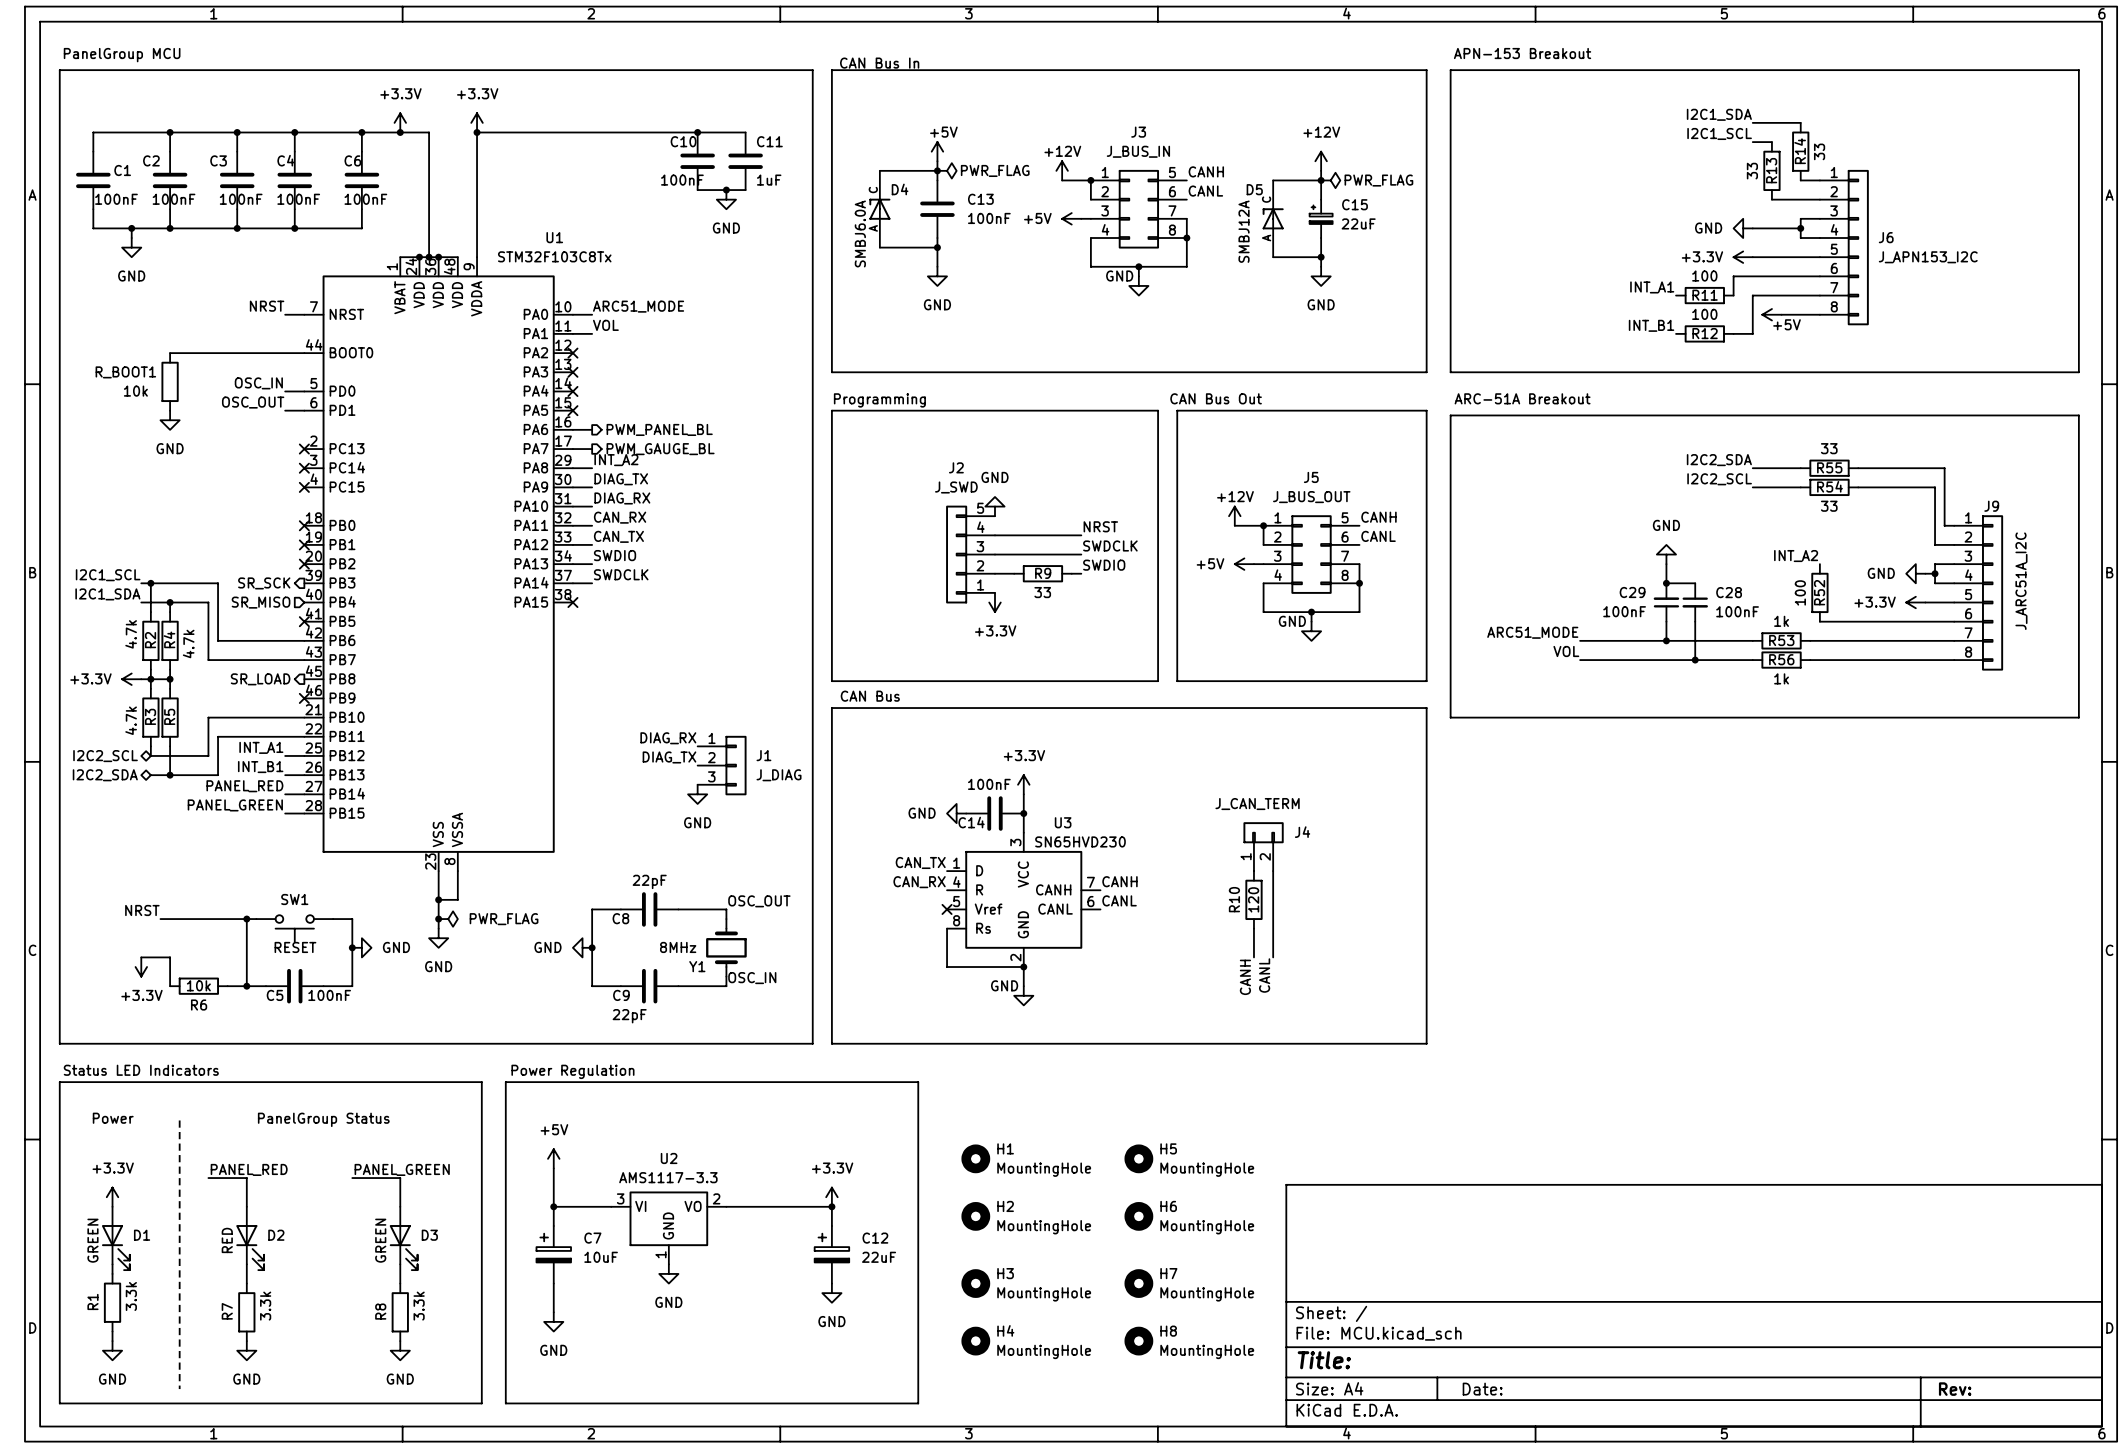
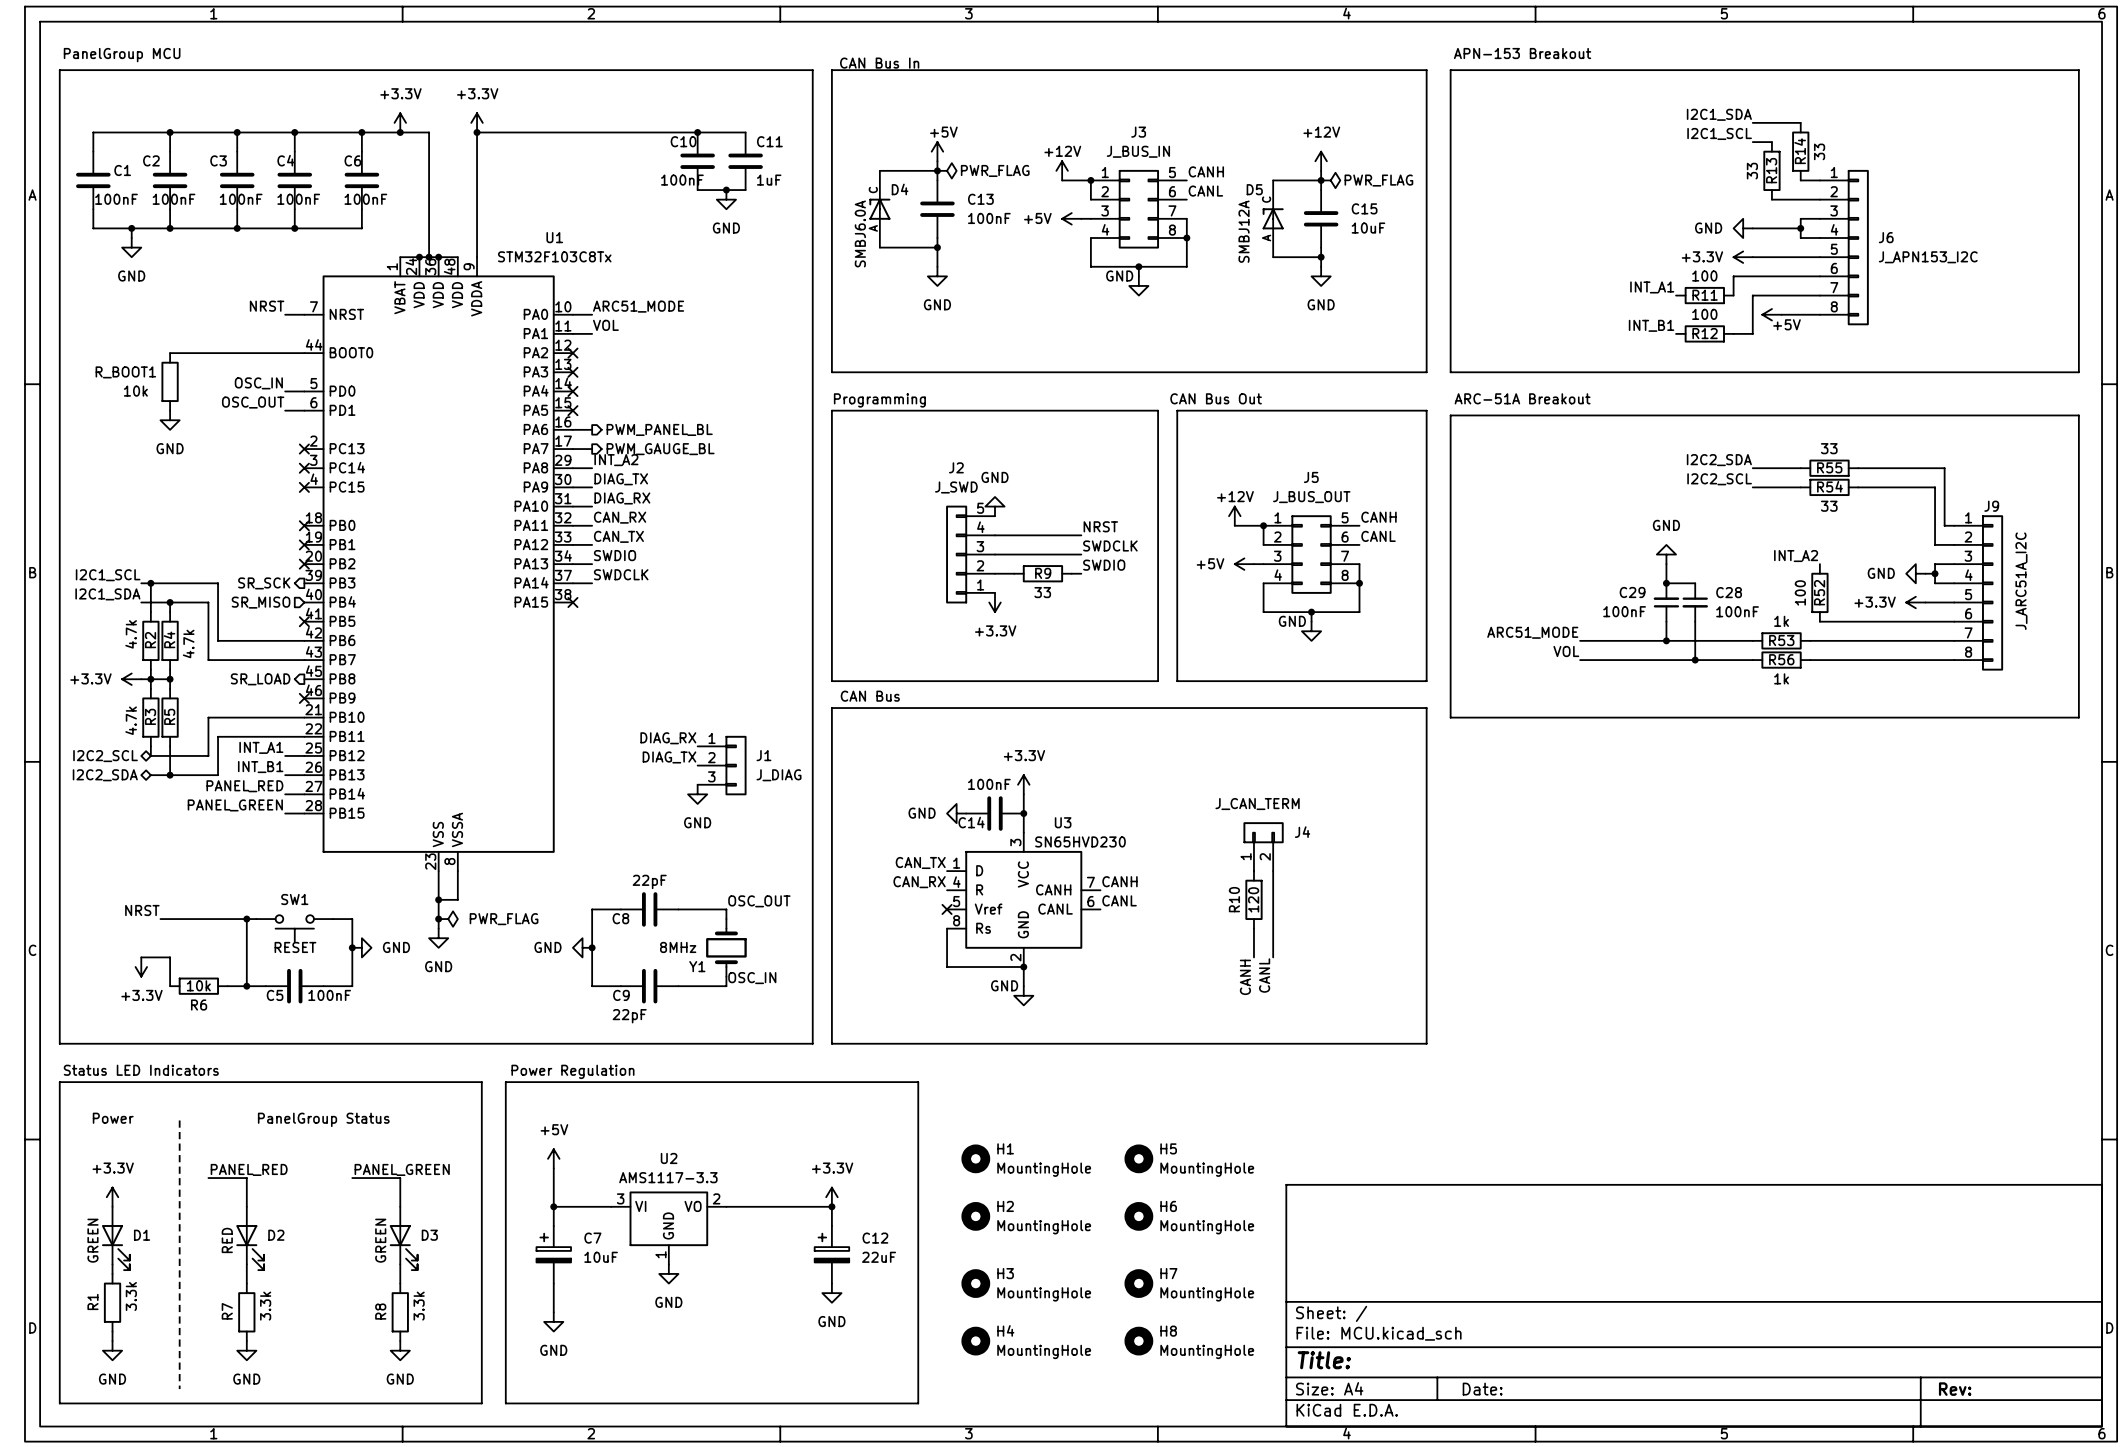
C15 symbol: [1309, 199, 1333, 239] -> [1303, 190, 1339, 248]
C15 value: 22uF (1358, 223) -> 10uF (1368, 228)

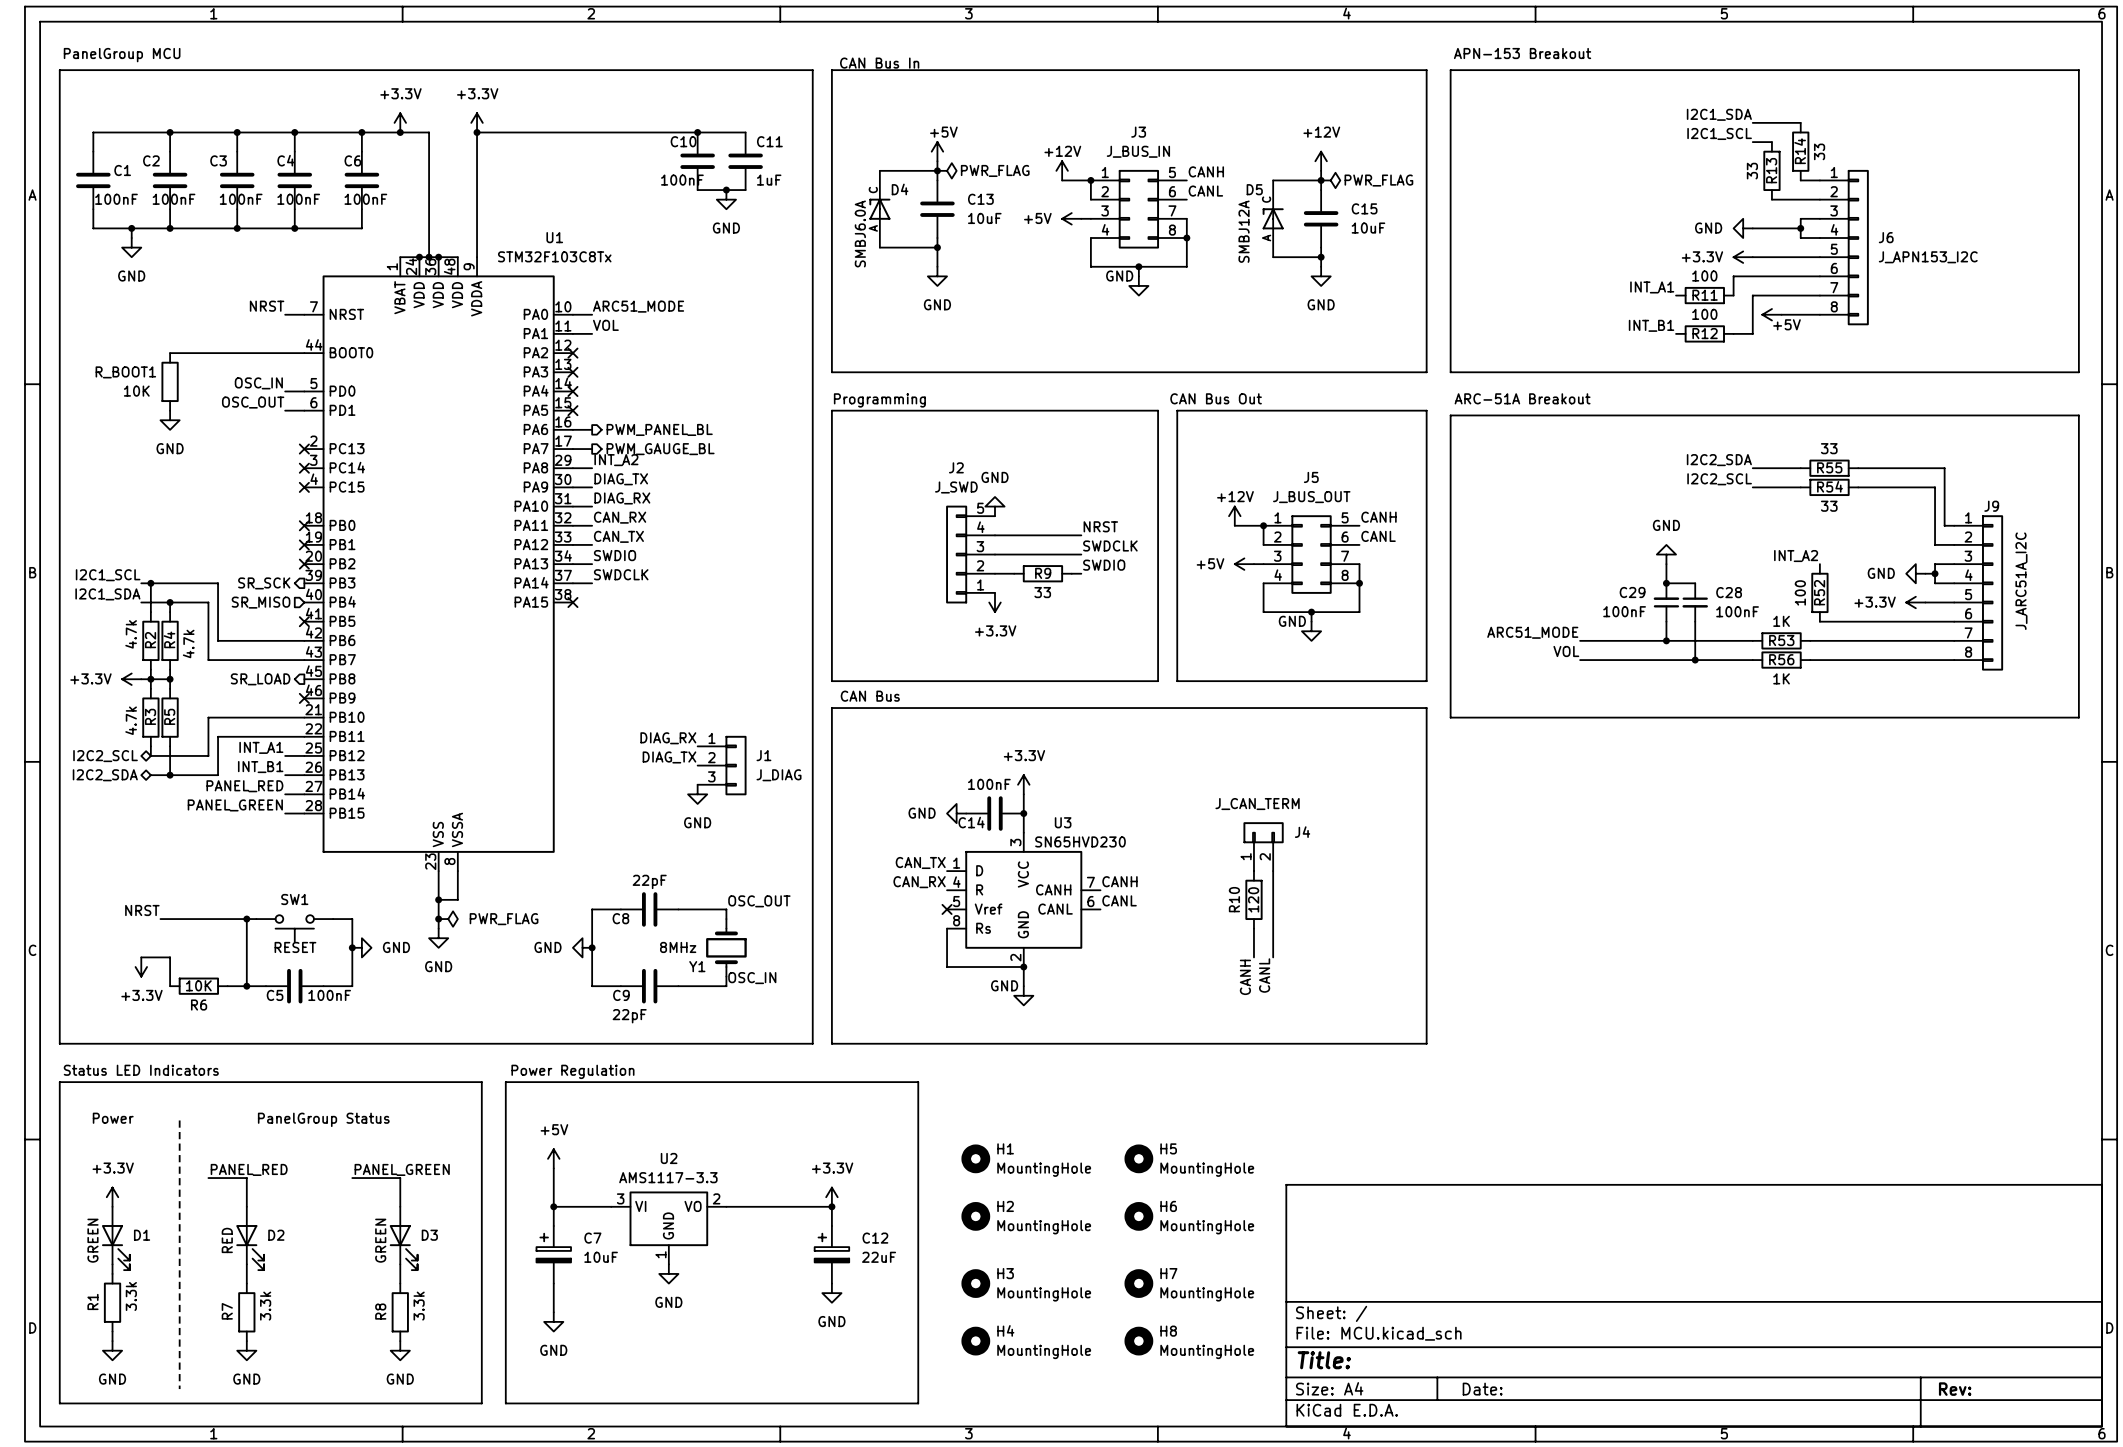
C13 value: 100nF (989, 218) -> 10uF (984, 218)
R_BOOT1 value: 10k (135, 391) -> 10K (136, 391)
R53 value: 1k (1781, 621) -> 1K (1781, 621)
R56 value: 1k (1781, 678) -> 1K (1781, 678)
R6 value: 10k (198, 985) -> 10K (198, 985)

